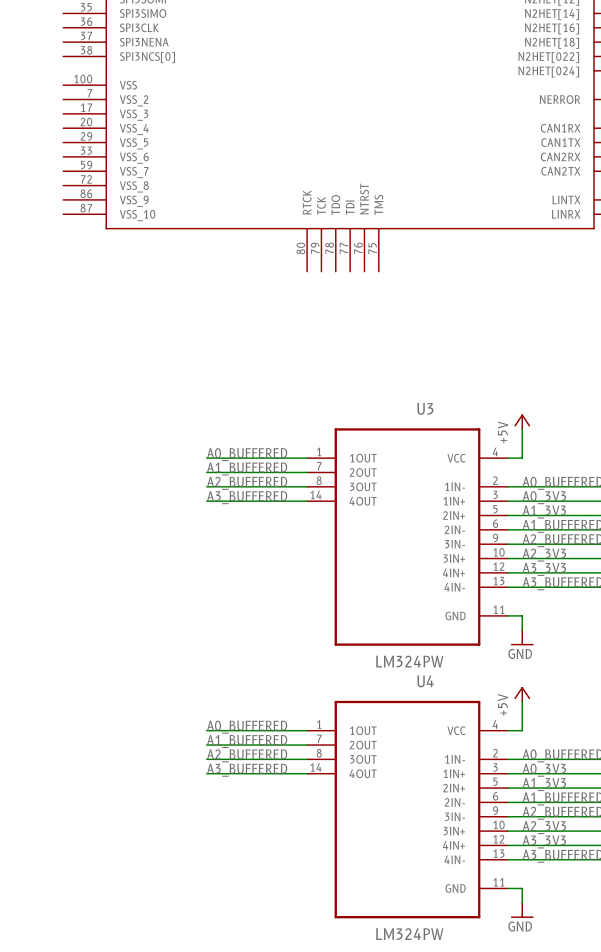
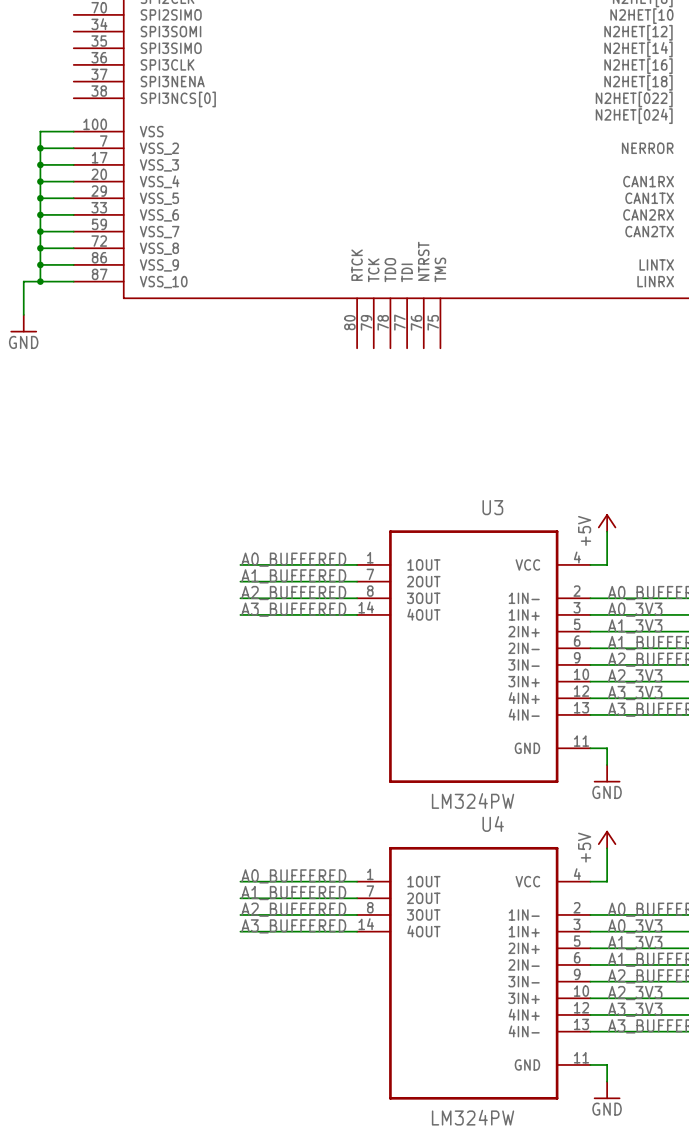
wire: none -> (73, 131) (40, 131) (40, 281)
wire: none -> (40, 148) (73, 148)
junction: none -> (40, 148)
wire: none -> (40, 164) (73, 164)
junction: none -> (40, 164)
wire: none -> (40, 181) (73, 181)
junction: none -> (40, 181)
wire: none -> (40, 198) (73, 198)
junction: none -> (40, 198)
wire: none -> (40, 214) (73, 214)
junction: none -> (40, 214)
wire: none -> (40, 231) (73, 231)
junction: none -> (40, 231)
wire: none -> (40, 248) (73, 248)
junction: none -> (40, 248)
wire: none -> (40, 264) (73, 264)
junction: none -> (40, 264)
junction: none -> (40, 281)
wire: none -> (73, 281) (23, 281) (23, 314)
power symbol: none -> GND (23, 323)

